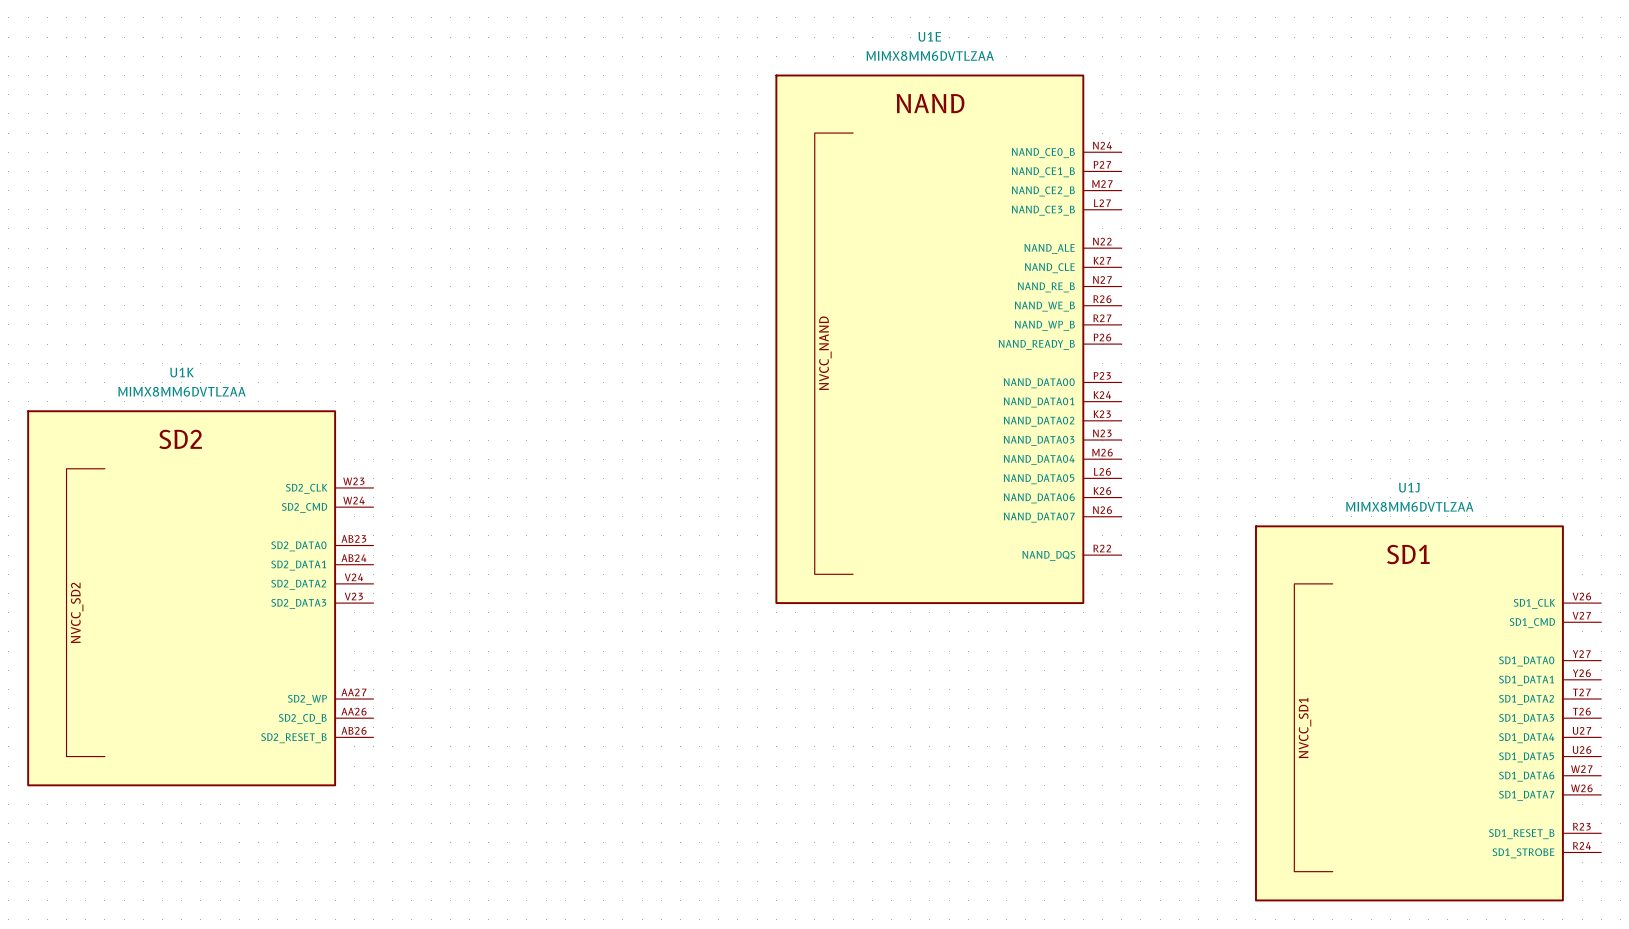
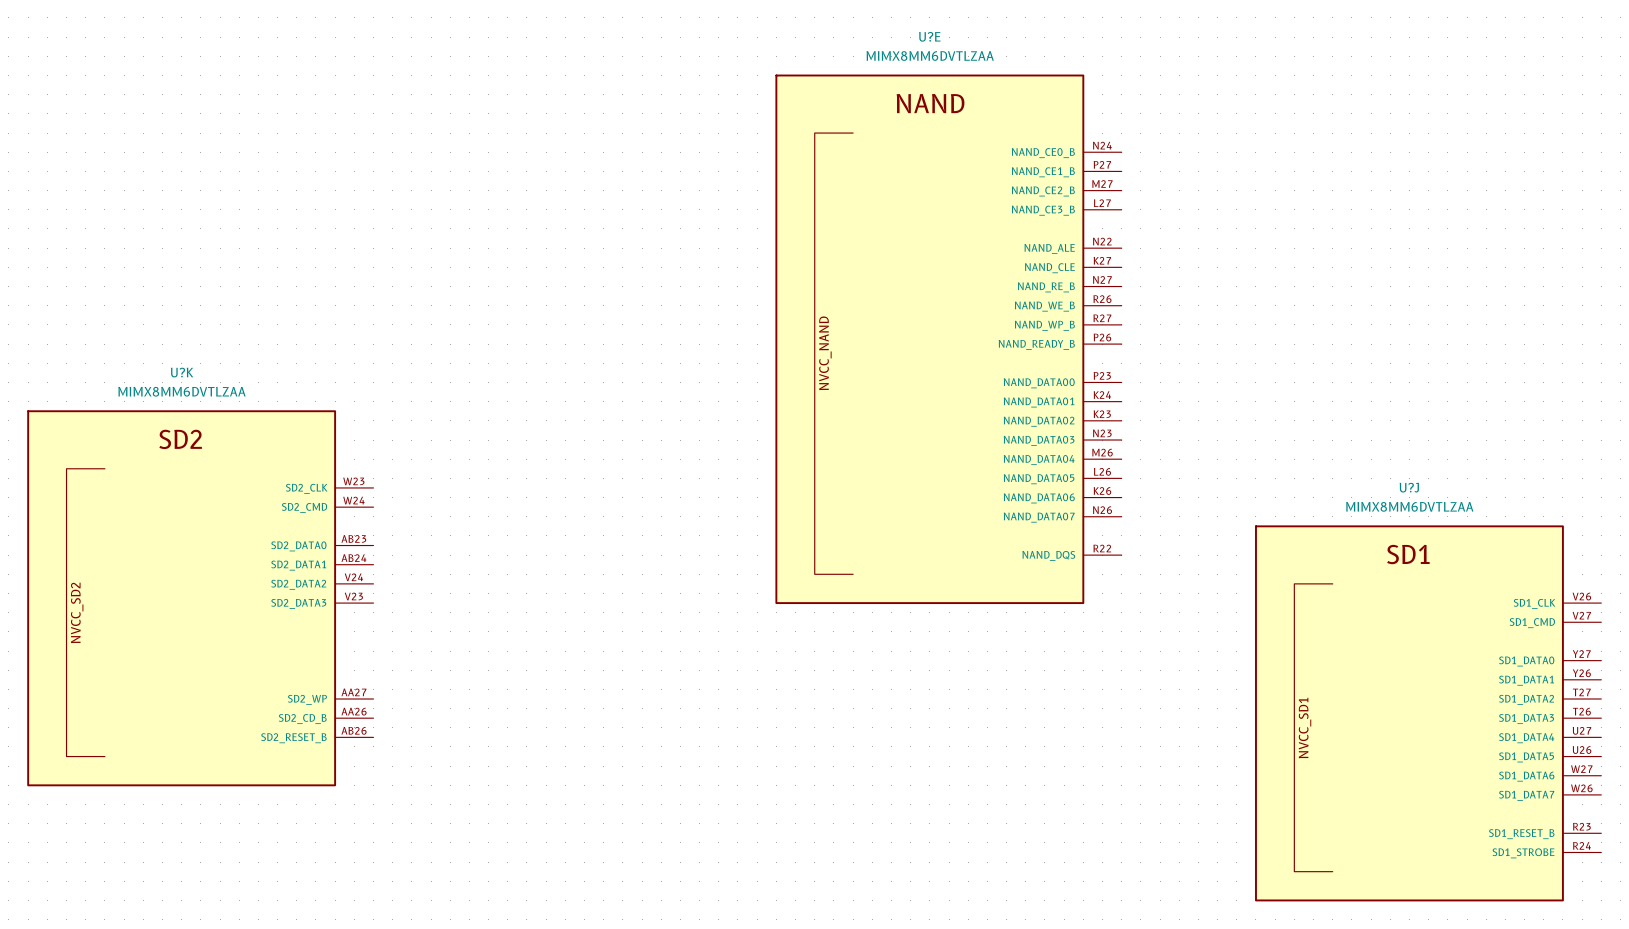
U1E name: U1E (929, 36) -> U?E (929, 36)
U1K name: U1K (182, 372) -> U?K (182, 372)
U1J name: U1J (1409, 487) -> U?J (1409, 487)

